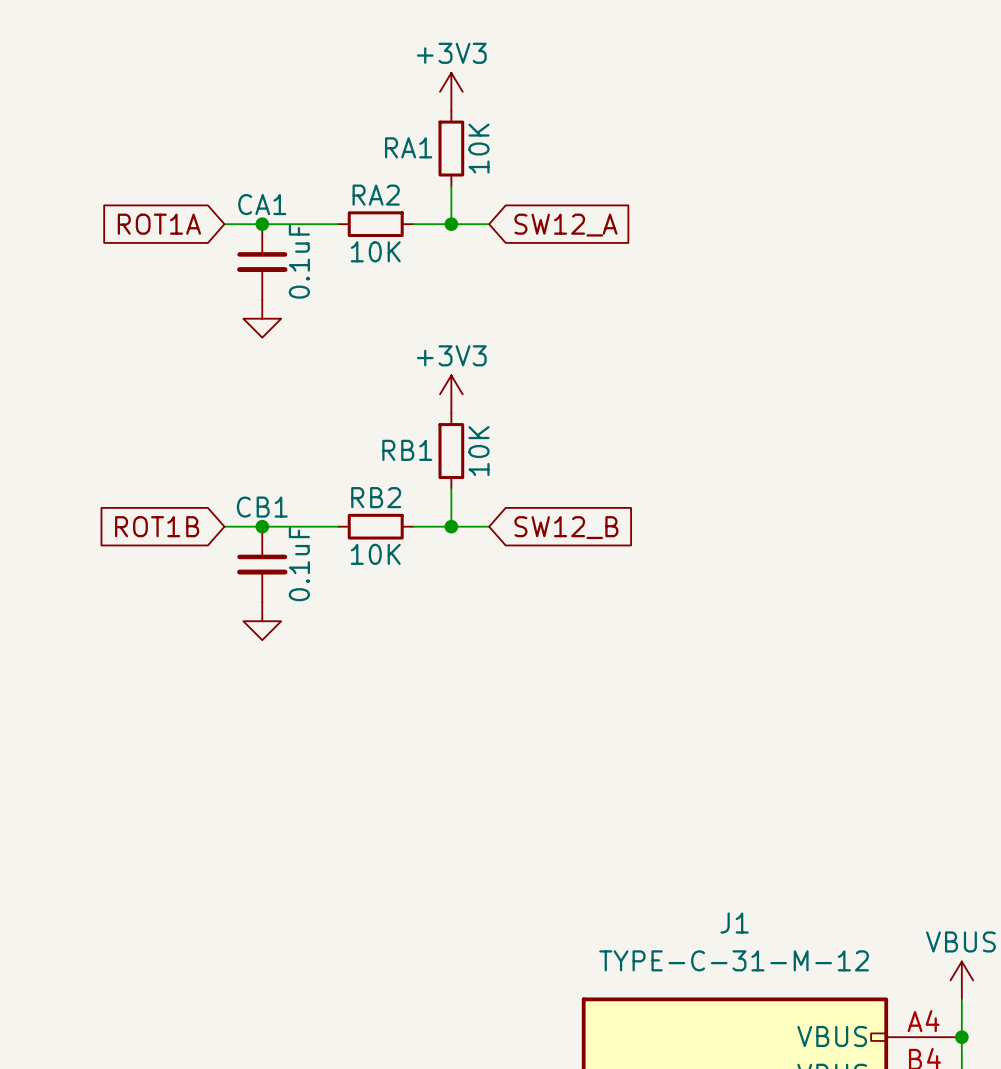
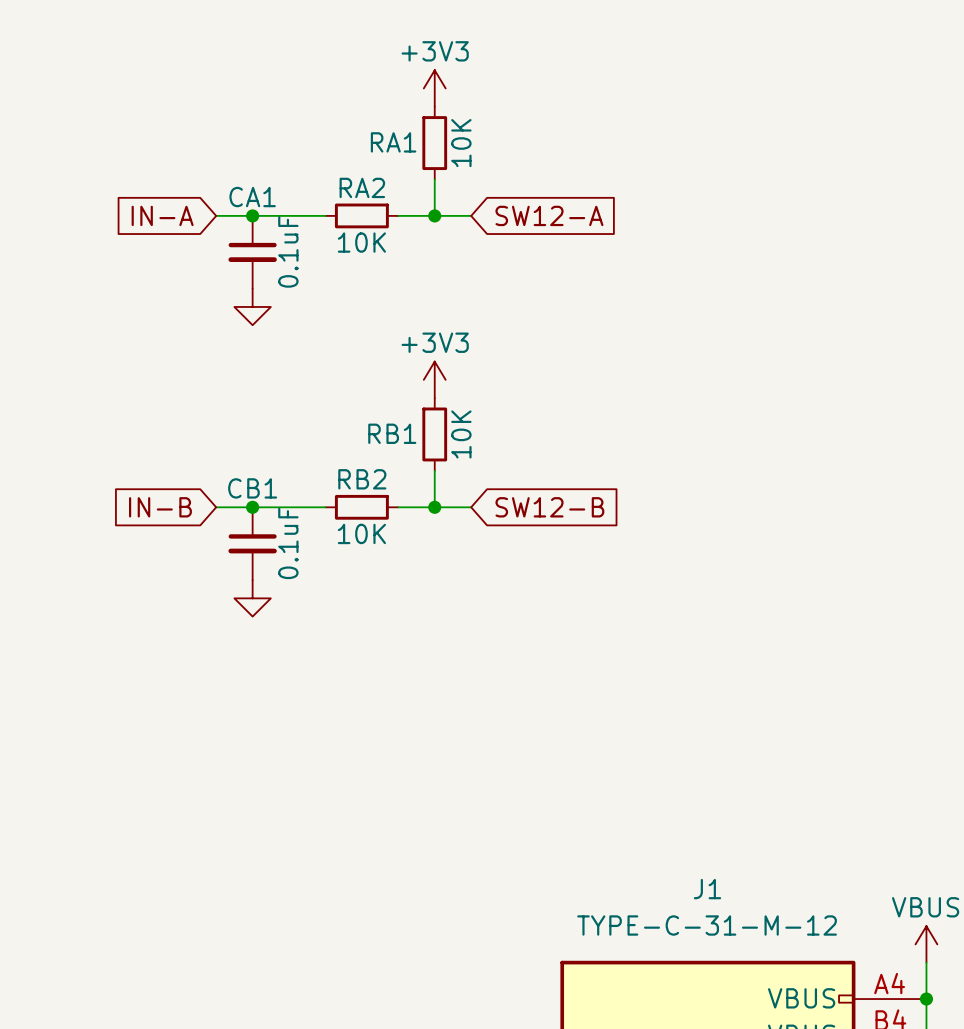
global label: ROT1A (159, 224) -> IN-A (162, 215)
global label: SW12_A (565, 225) -> SW12-A (549, 215)
global label: ROT1B (157, 526) -> IN-B (160, 507)
global label: SW12_B (566, 527) -> SW12-B (549, 507)

